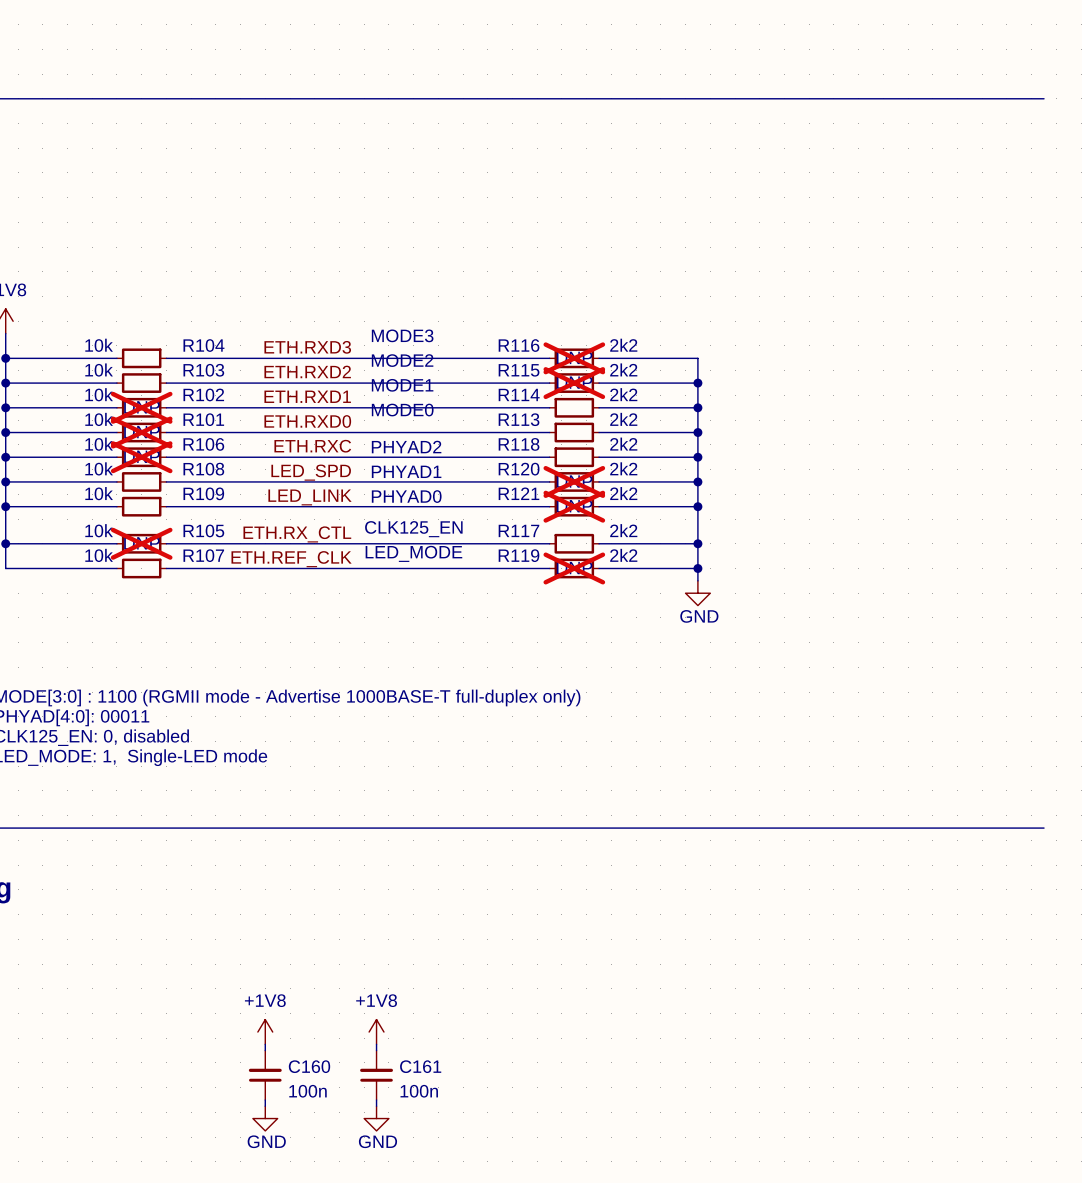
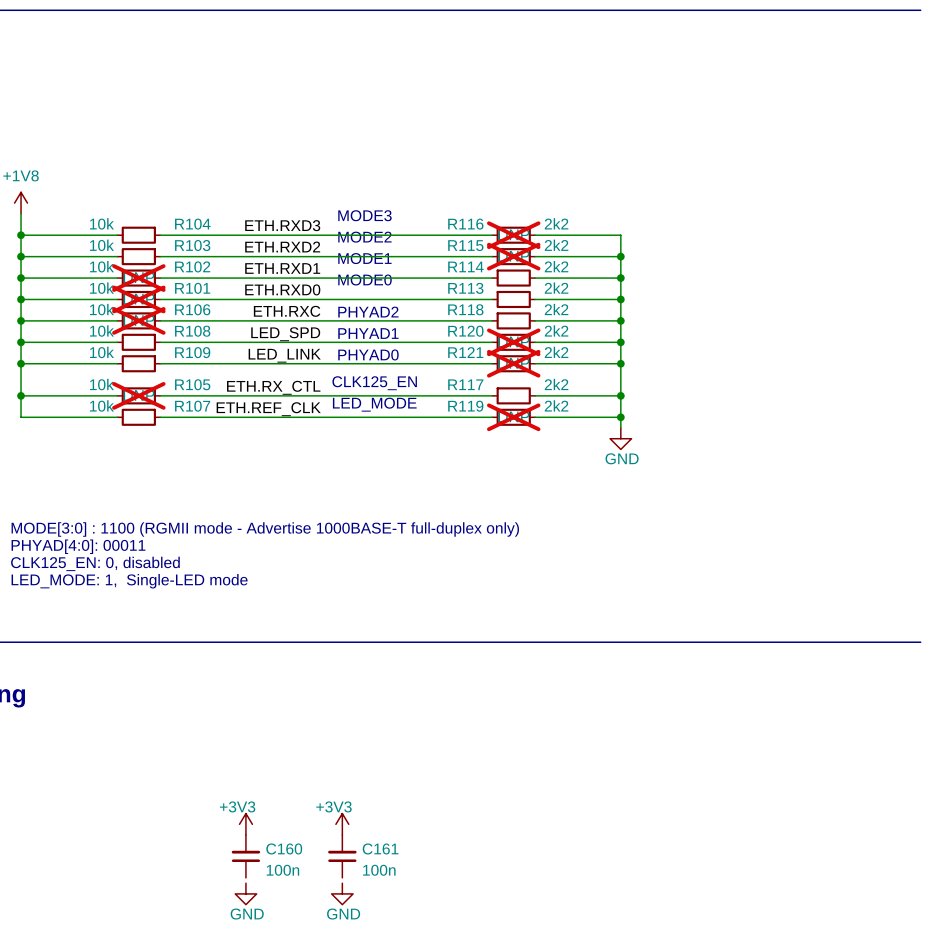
power symbol: +1V8 (265, 1032) -> +3V3 (245, 824)
power symbol: +1V8 (376, 1032) -> +3V3 (342, 824)
wire: (265, 1100) (265, 1106) -> none
wire: (376, 1100) (376, 1106) -> none

